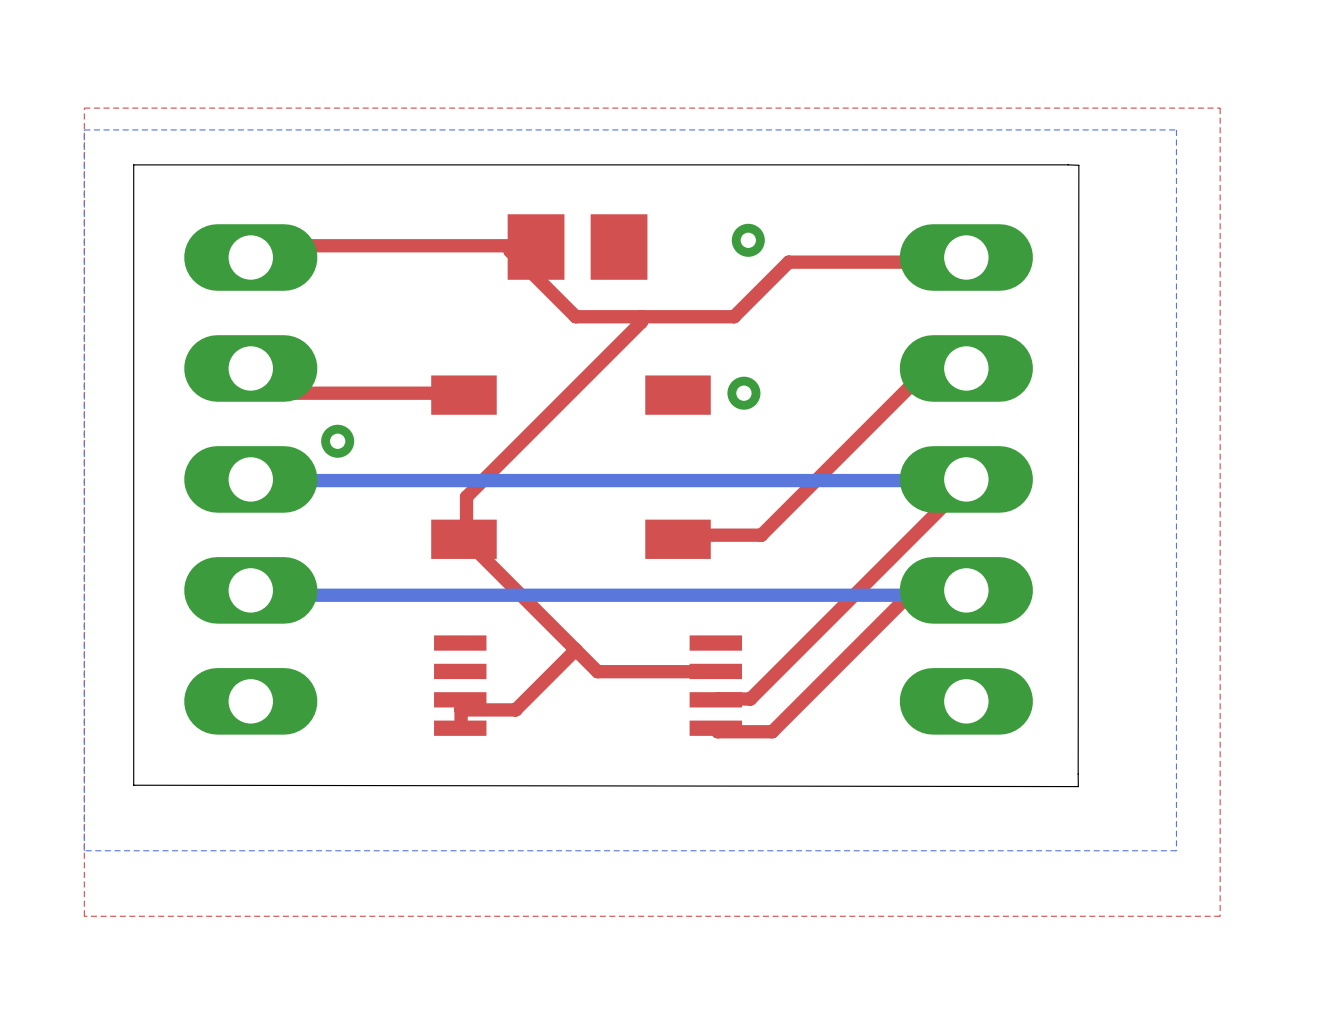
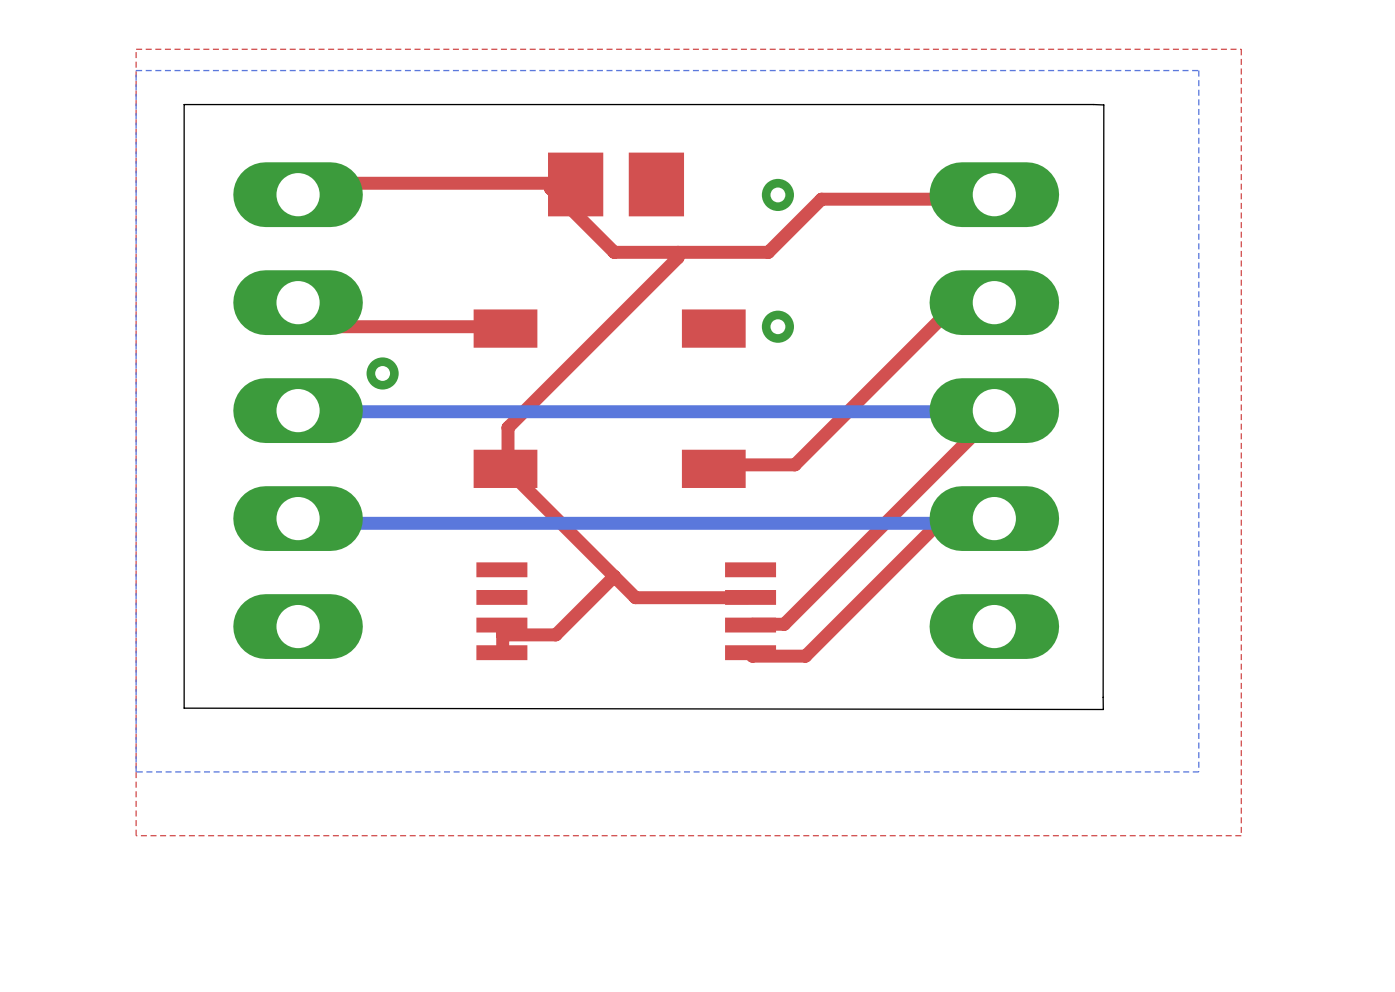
via position: (748, 240) -> (777, 194)

